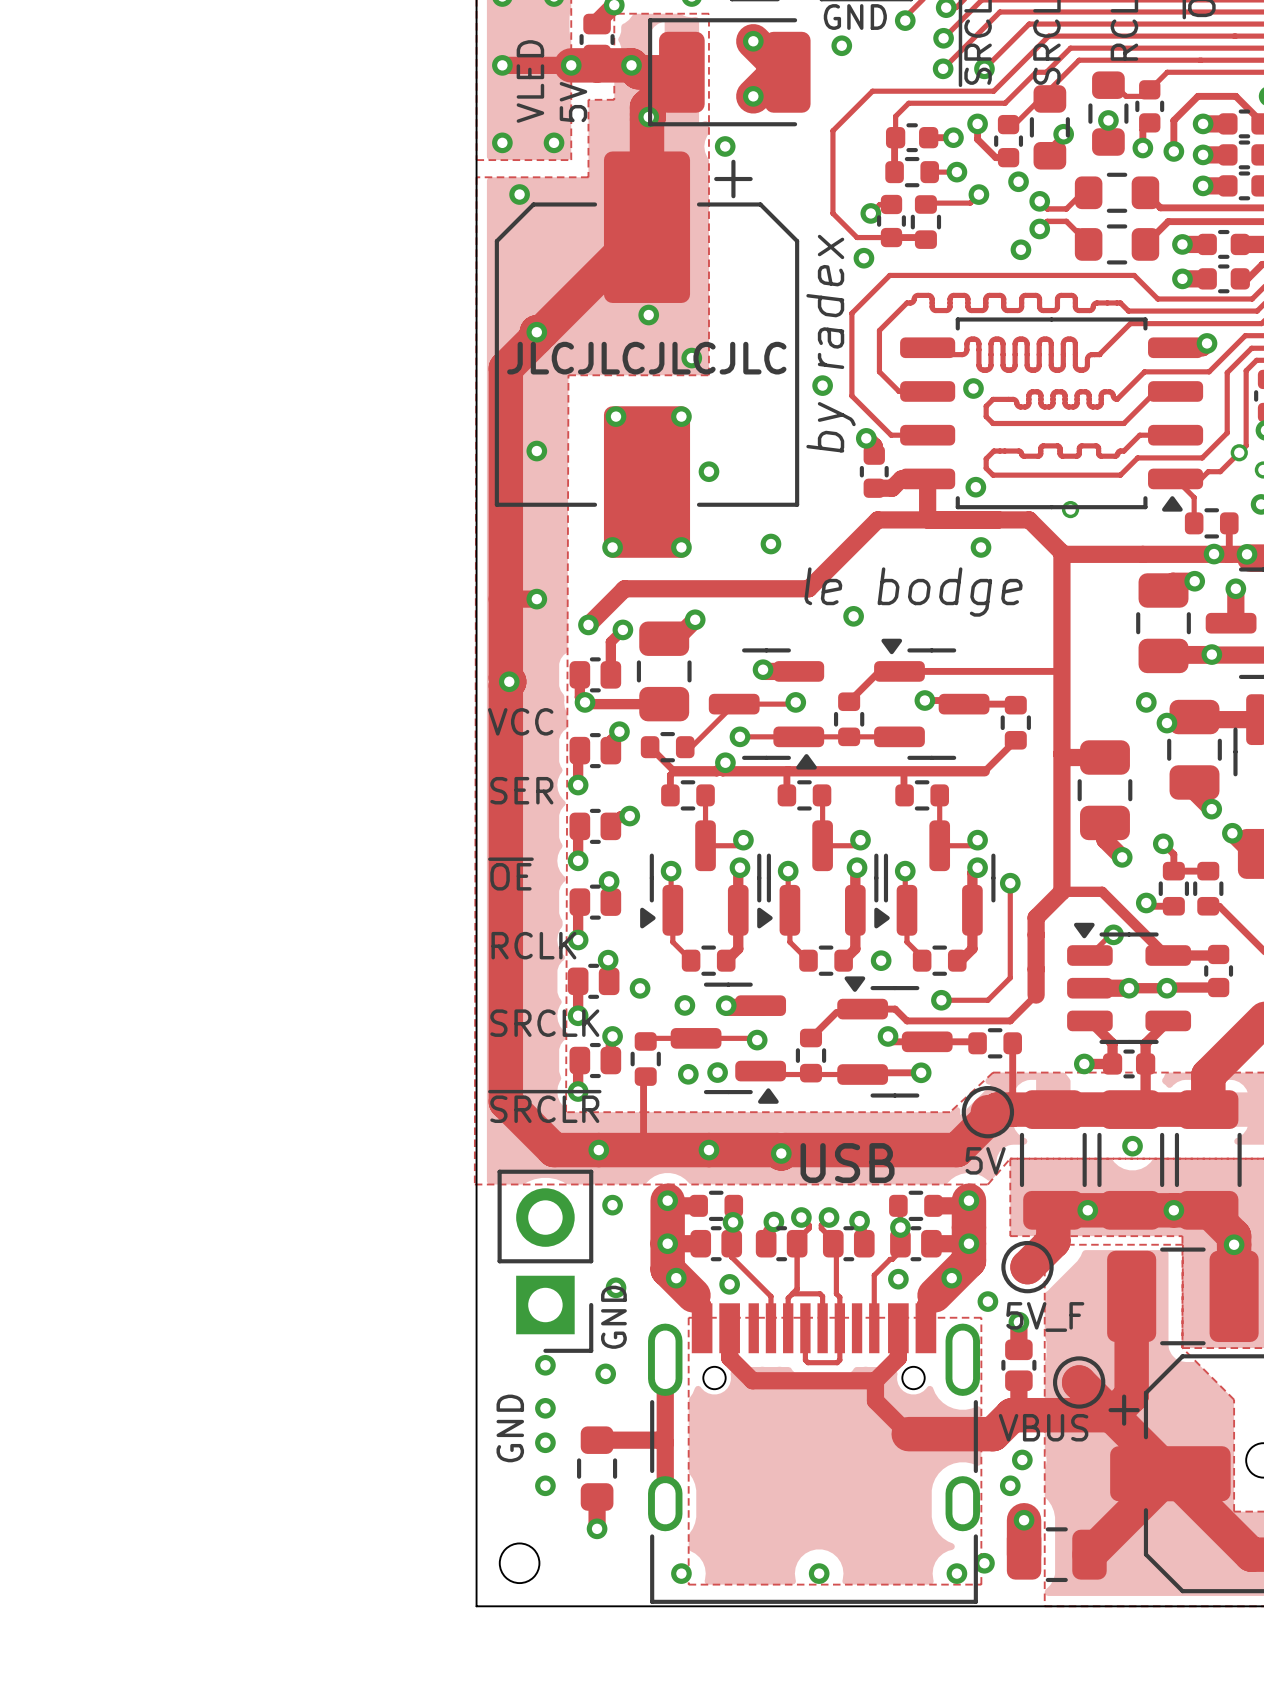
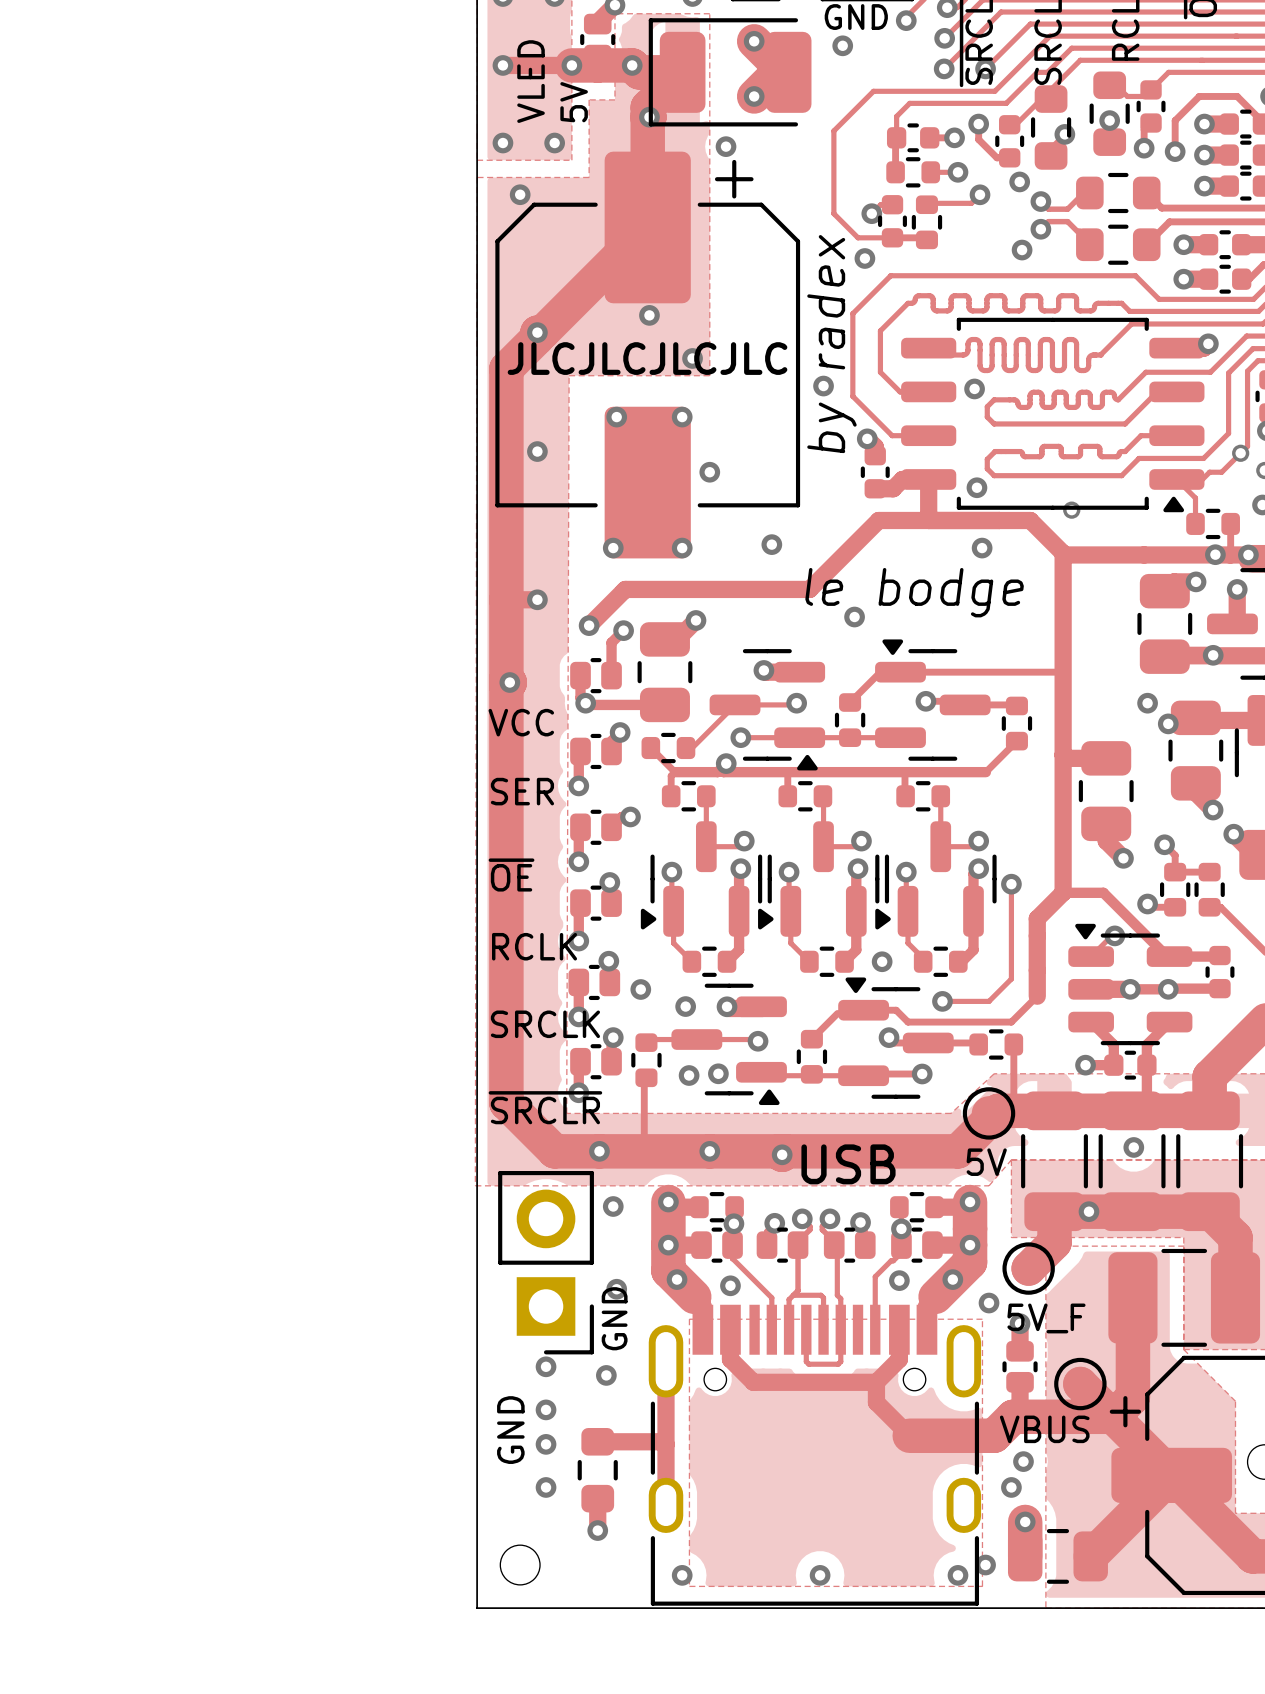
via: (1173, 1210) -> none
via: (1234, 1244) -> none

